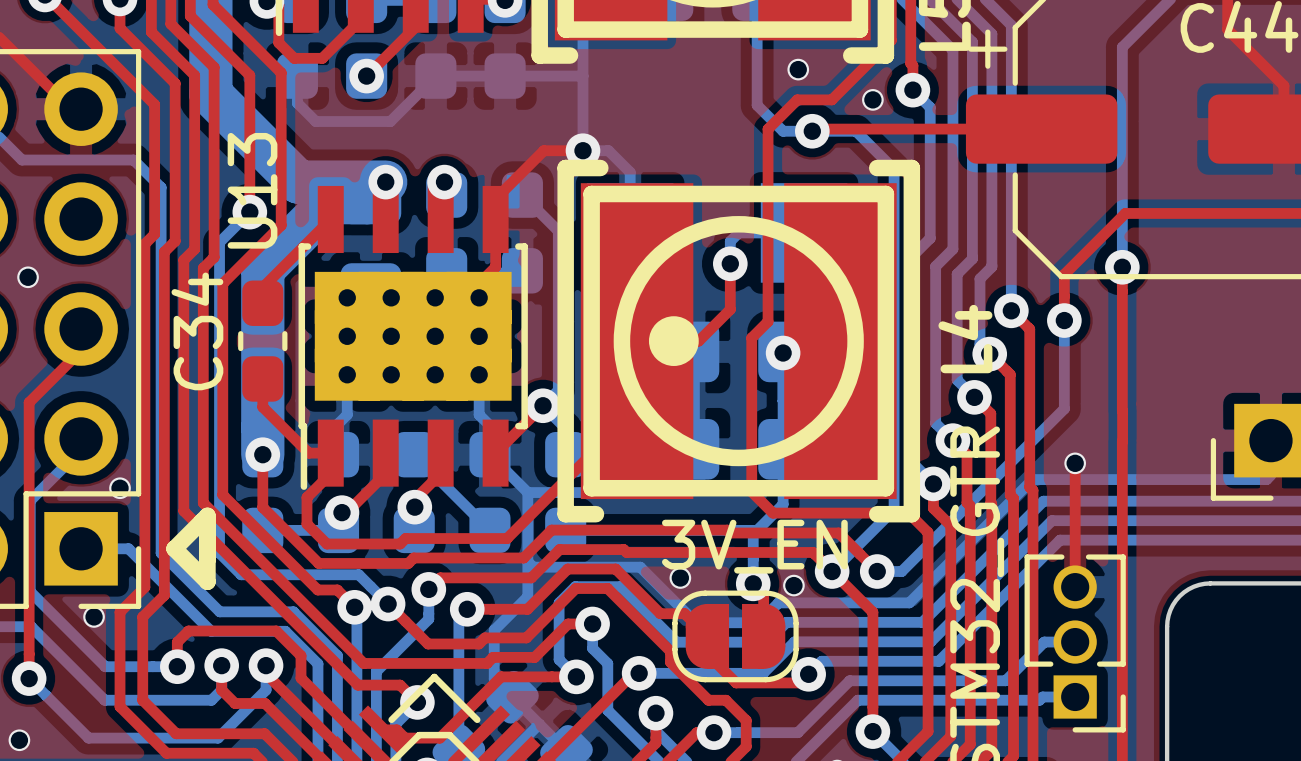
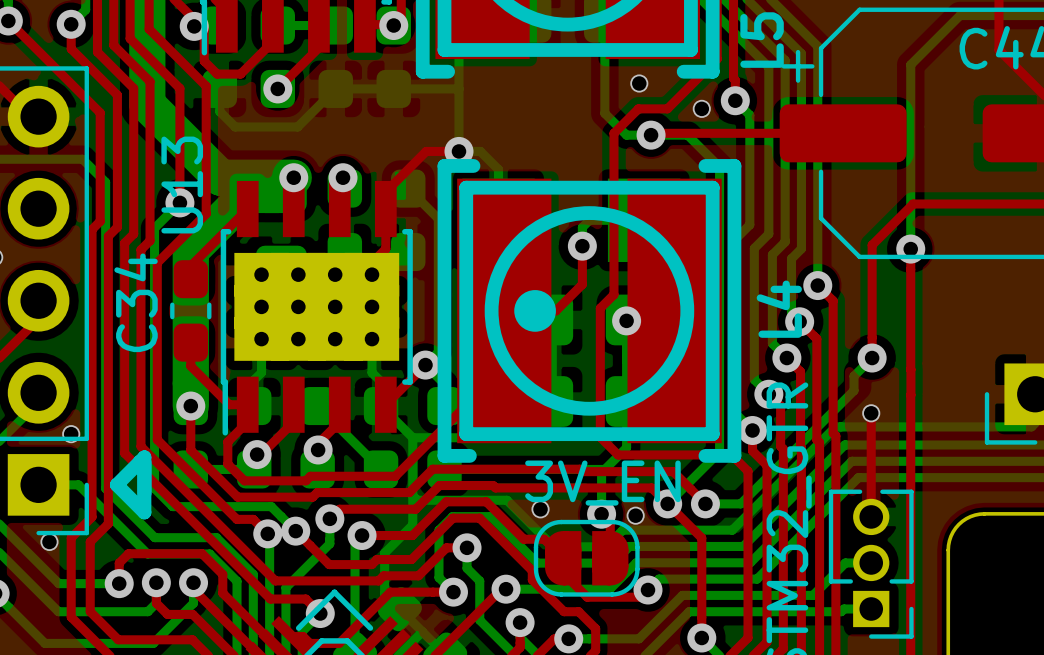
top track: (1076, 262) (1064, 274) (1064, 320) -> (872, 245) (872, 358)
bottom track: (1064, 320) (1064, 408) (901, 571) -> (872, 358) (854, 376) (854, 390) (740, 503) (725, 503)
via position: (1064, 320) -> (872, 358)

